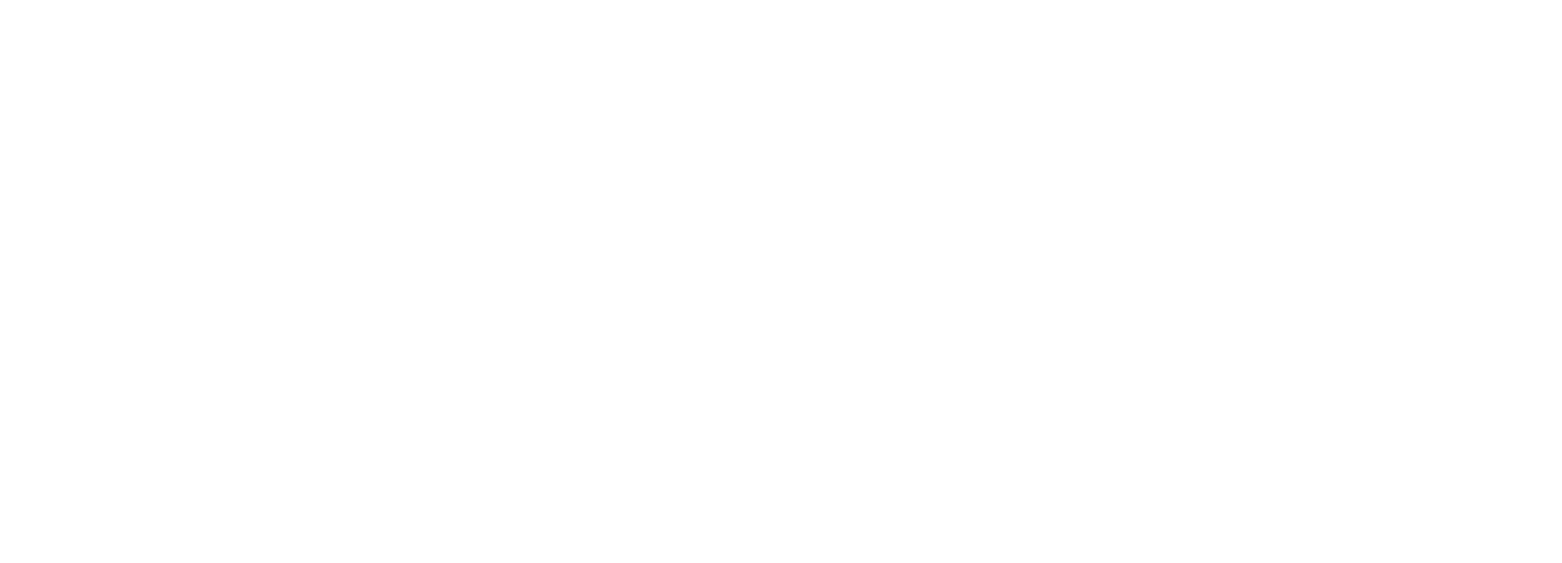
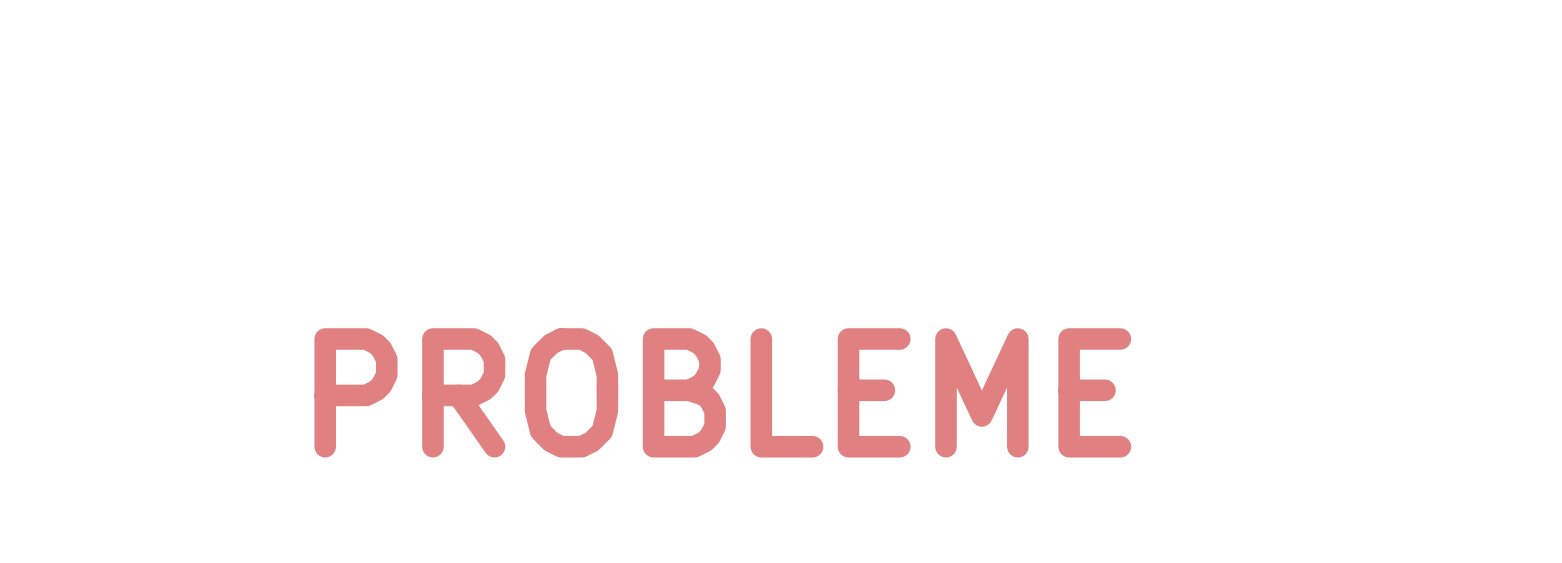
text: none -> PROBLEME (722, 392)

